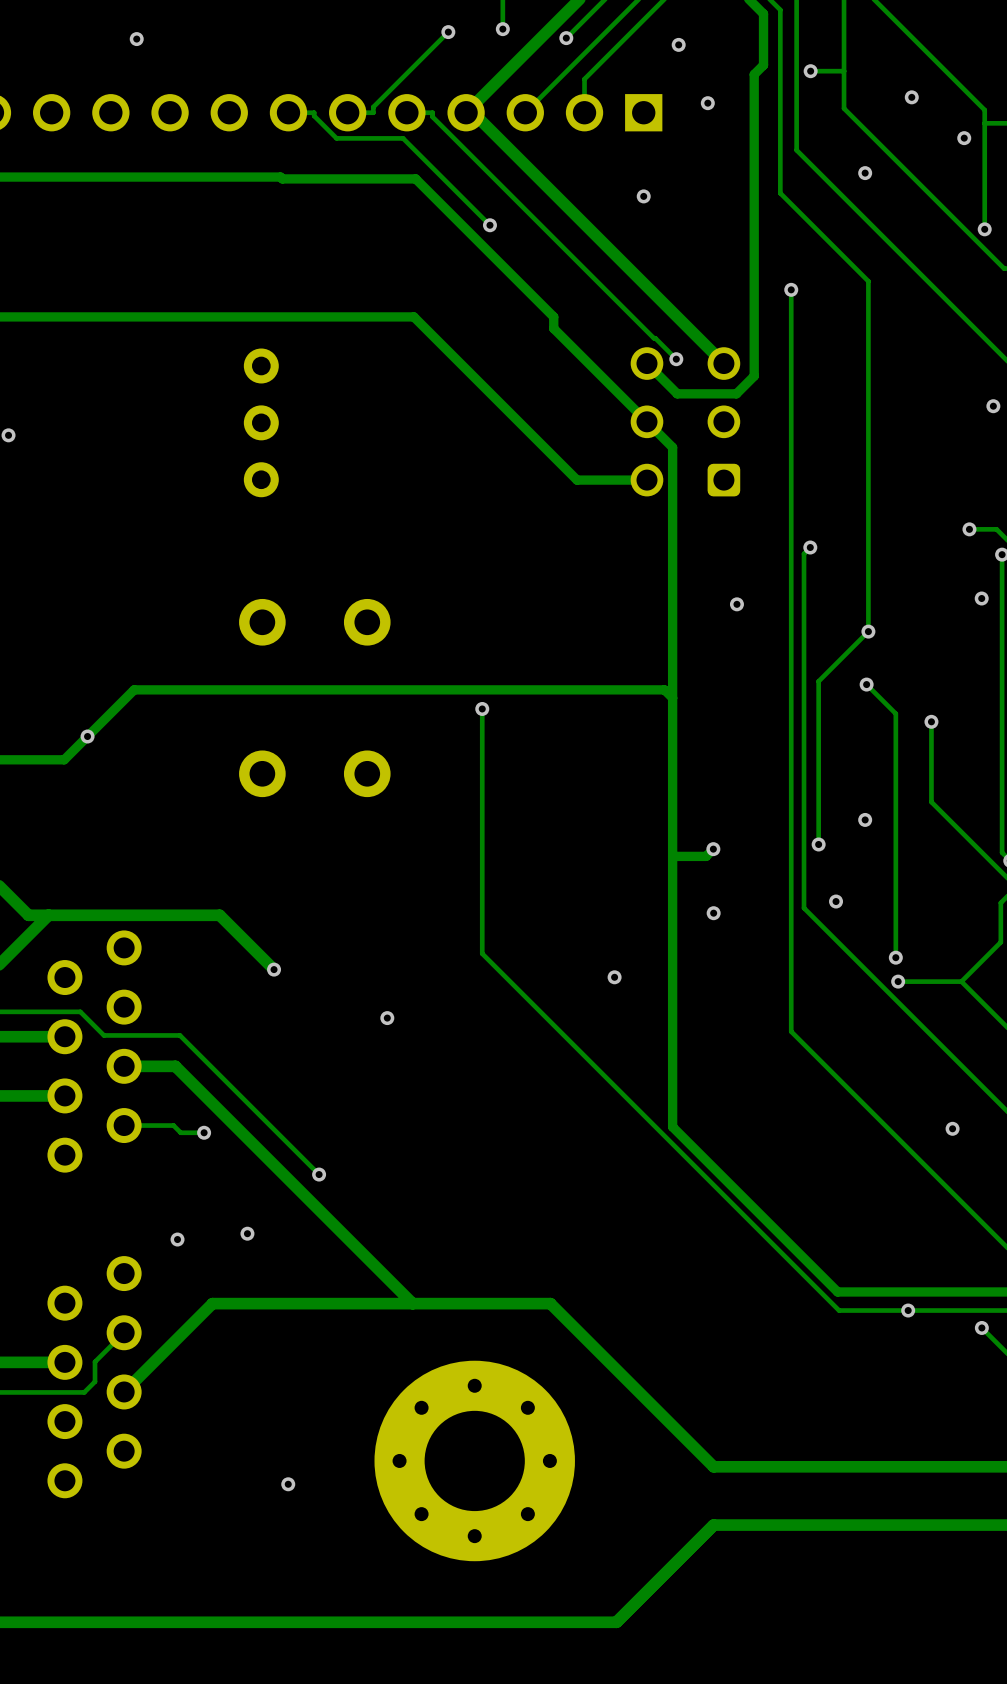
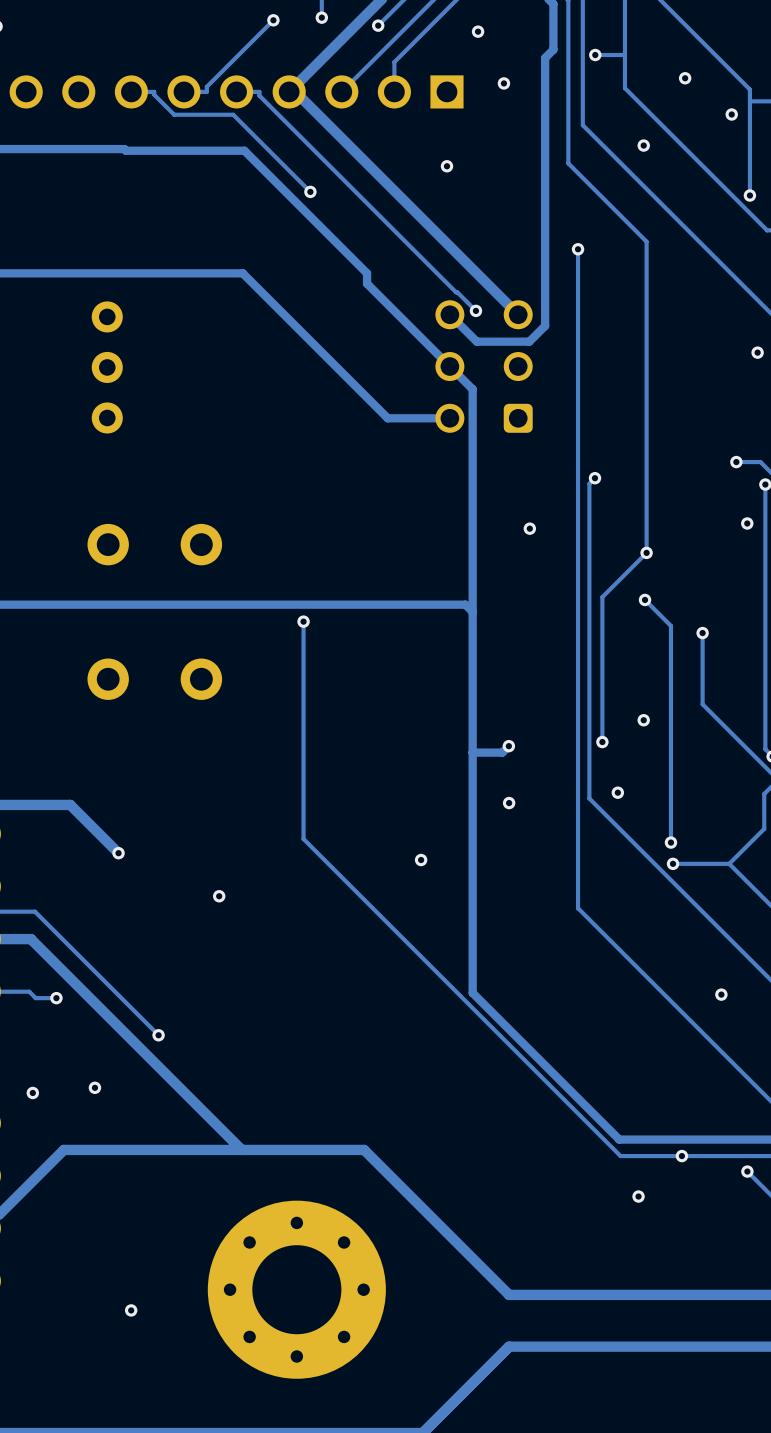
via: none -> (638, 1196)

